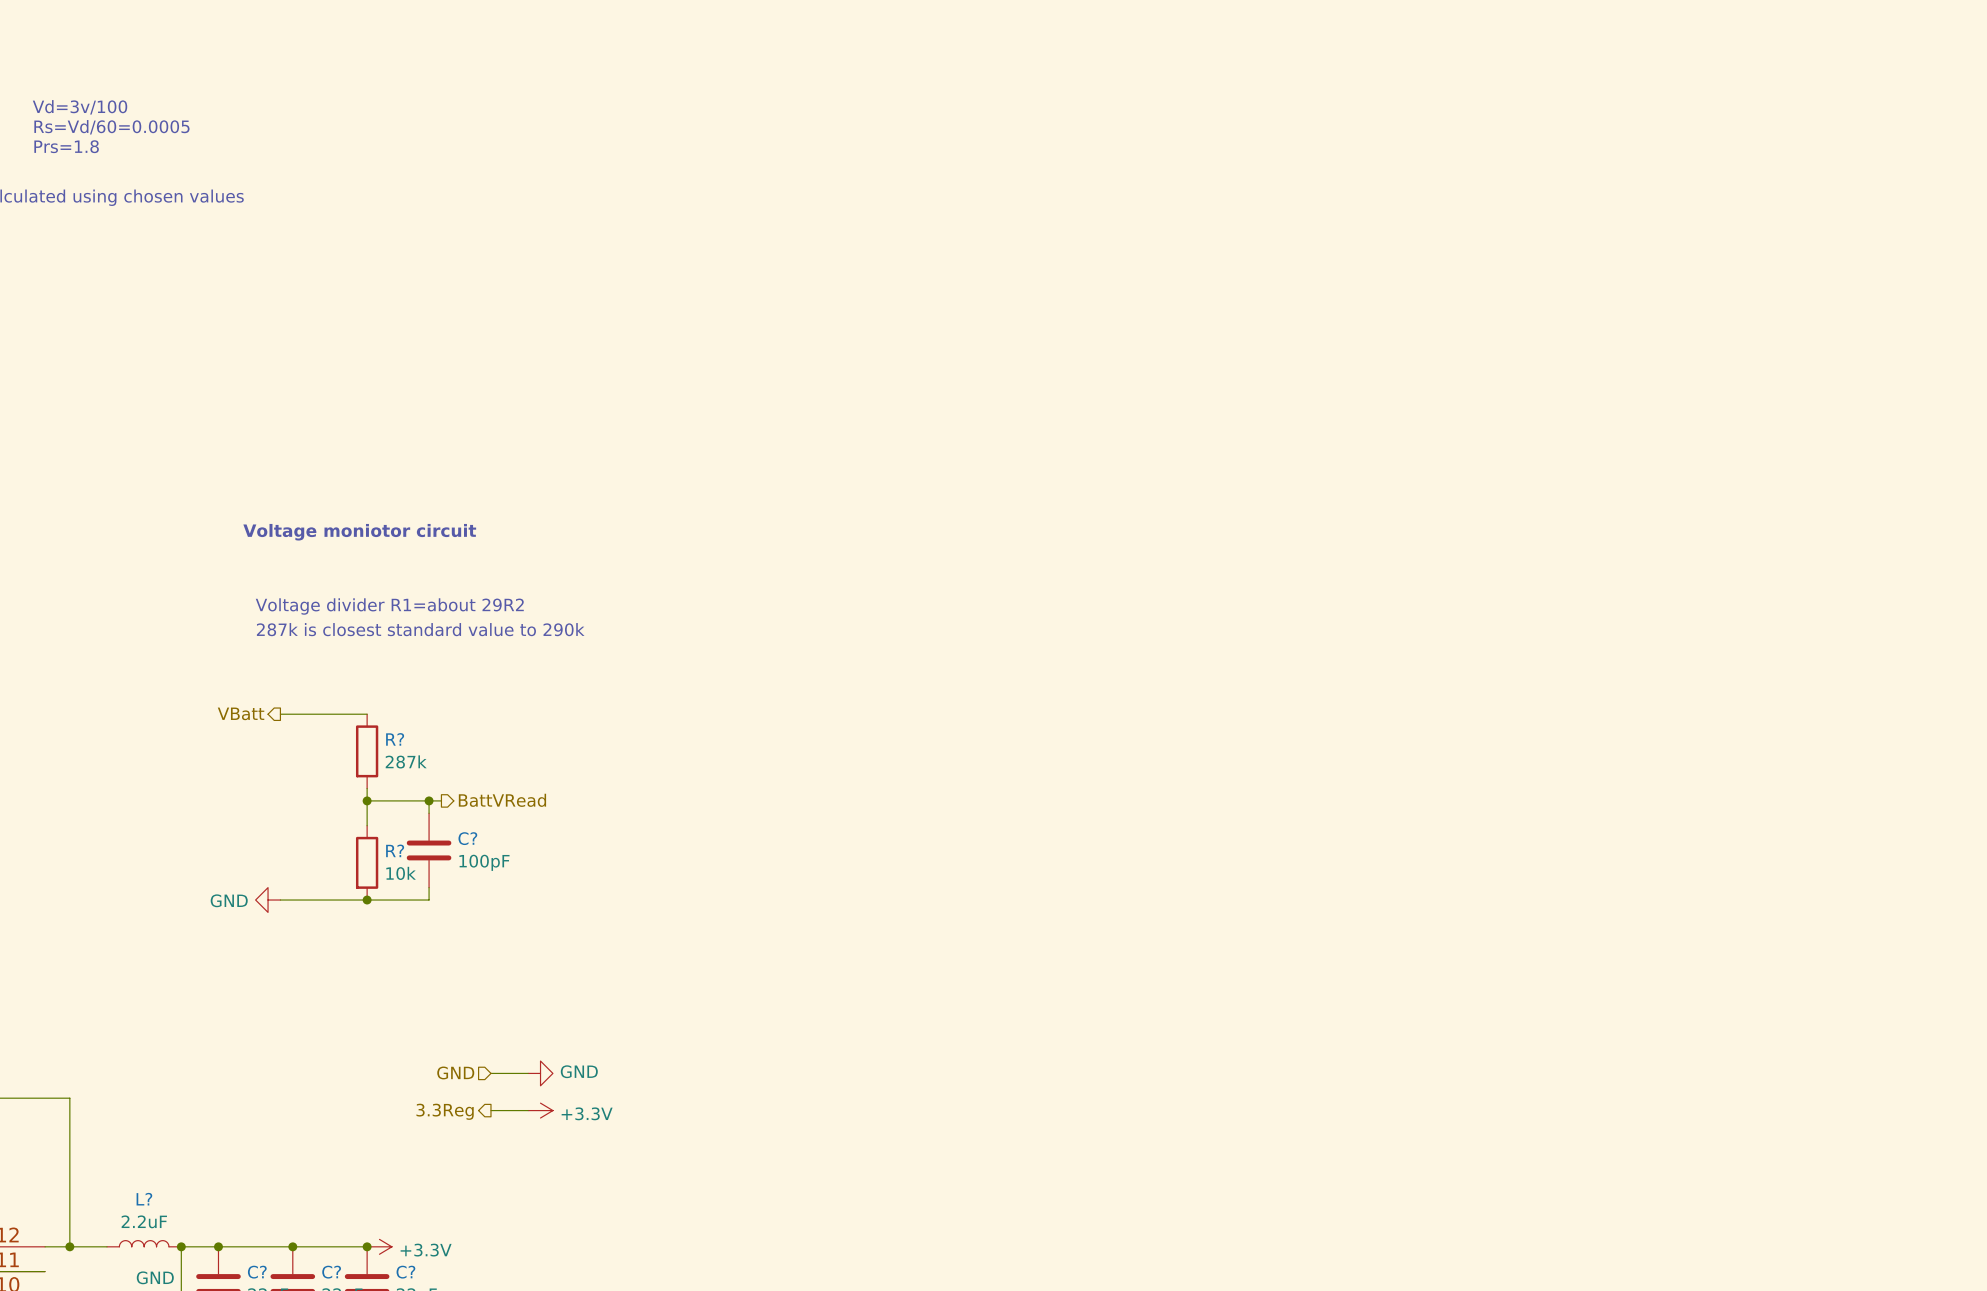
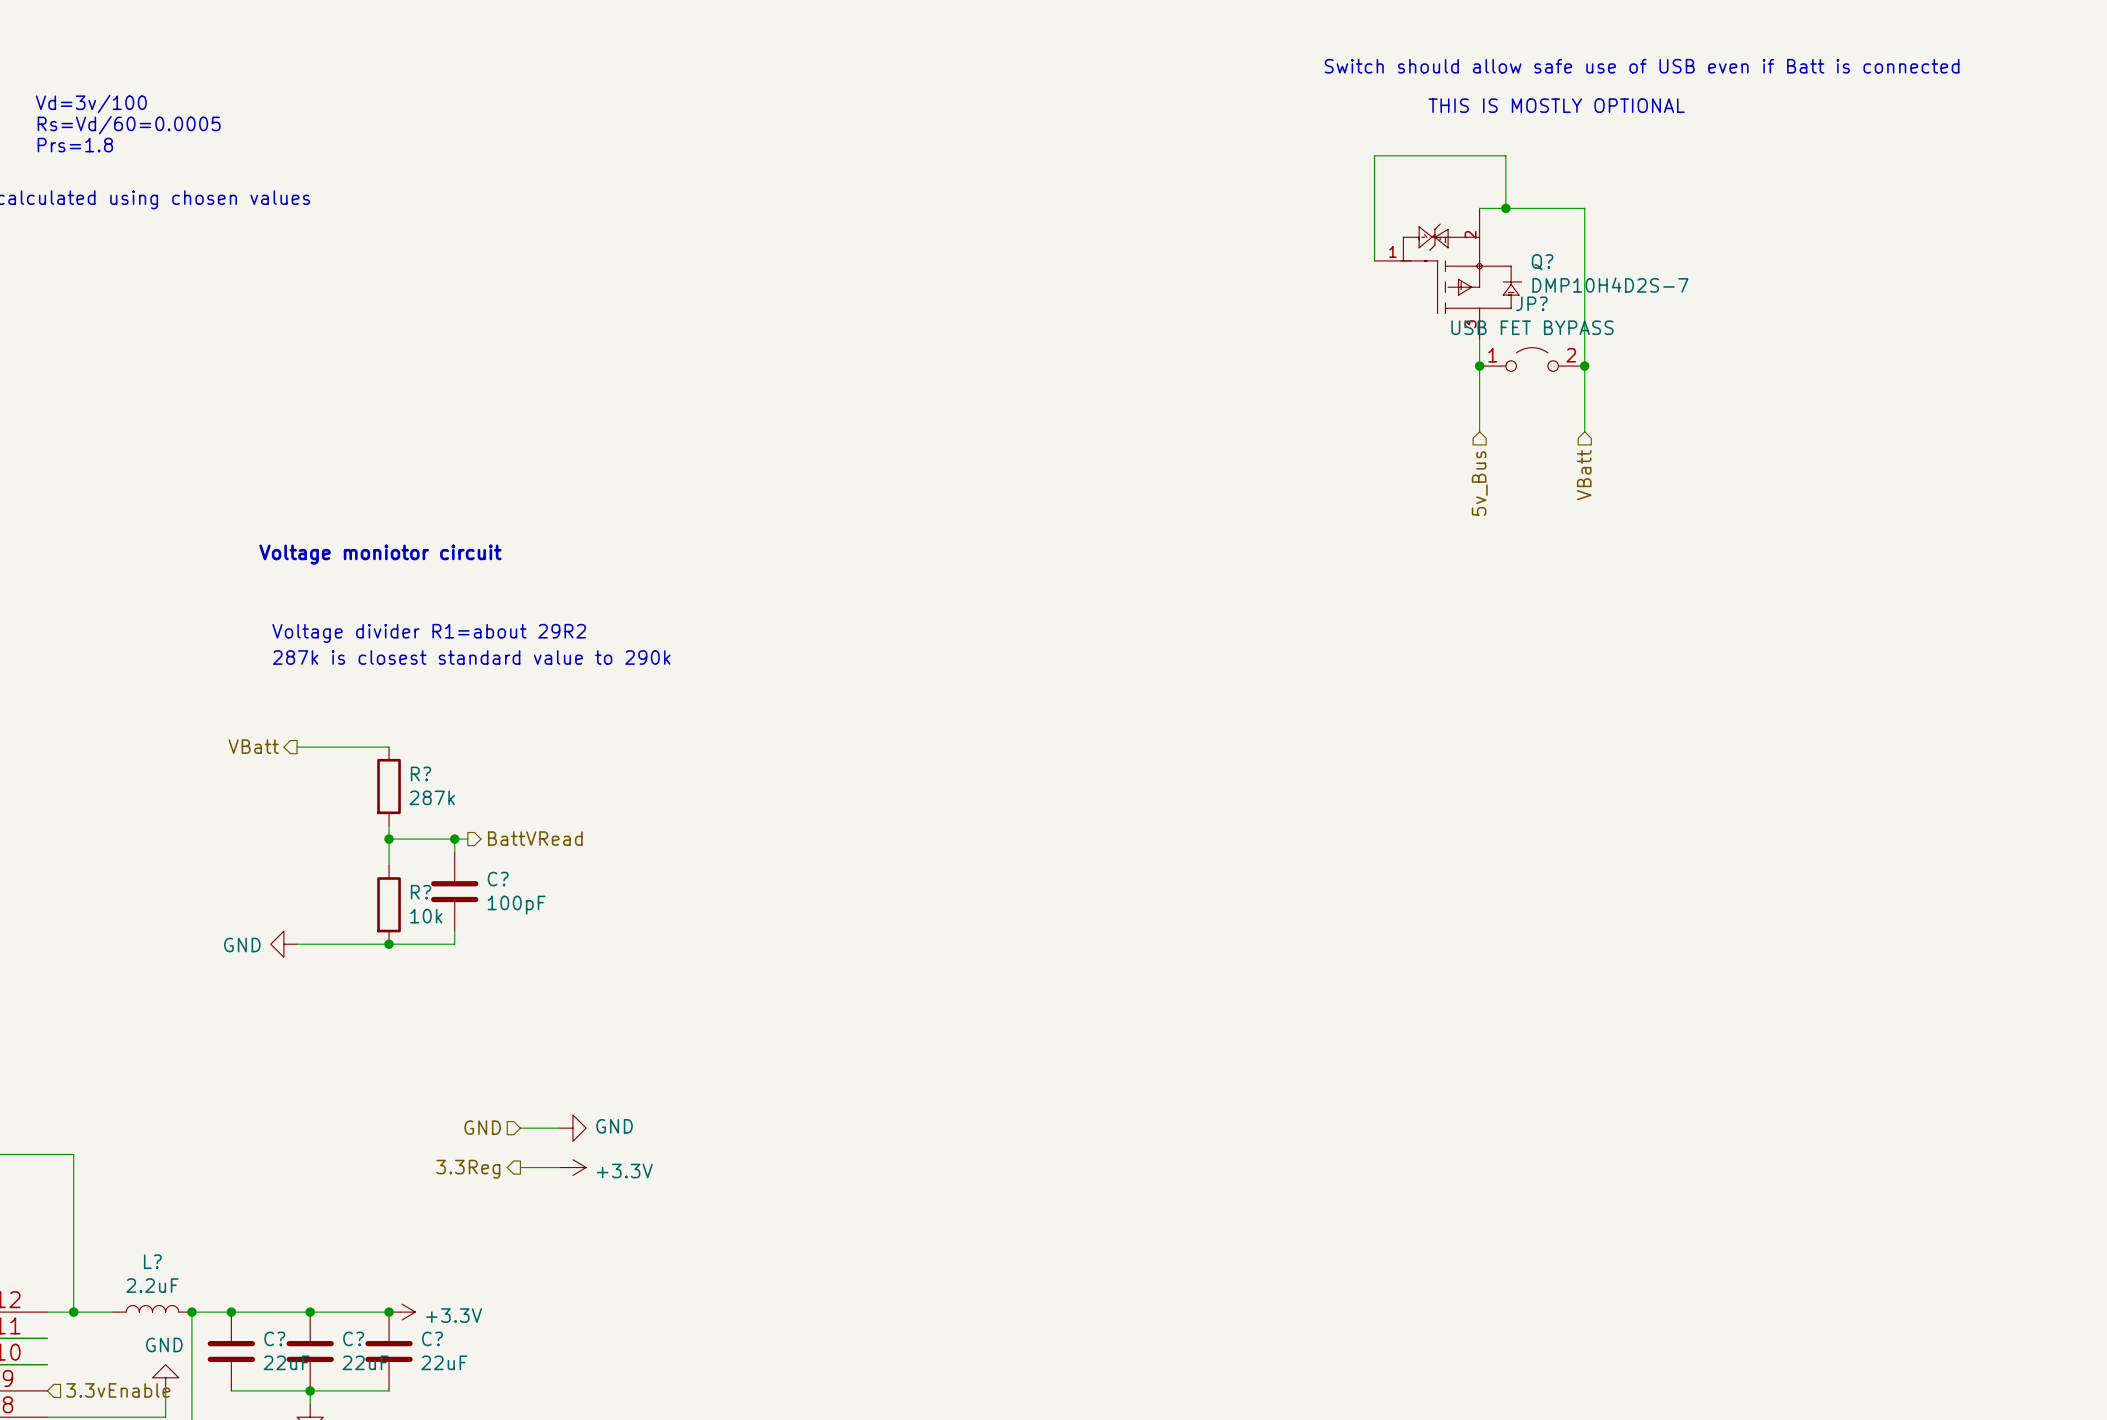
text: none -> Switch should allow safe use of USB even if Batt is connected (1642, 66)
text: none -> THIS IS MOSTLY OPTIONAL (1556, 105)
wire: none -> (1479, 208) (1584, 208) (1584, 431)
wire: none -> (1505, 208) (1505, 155) (1374, 155) (1374, 260)
junction: none -> (1505, 208)
Q?: none -> DMP10H4D2S-7 (1448, 274)
wire: none -> (1479, 339) (1479, 431)
JP?: none -> USB FET BYPASS (1532, 359)
junction: none -> (1479, 366)
junction: none -> (1584, 366)
hierarchical label: none -> VBatt (1584, 475)
hierarchical label: none -> 5v_Bus (1479, 483)

